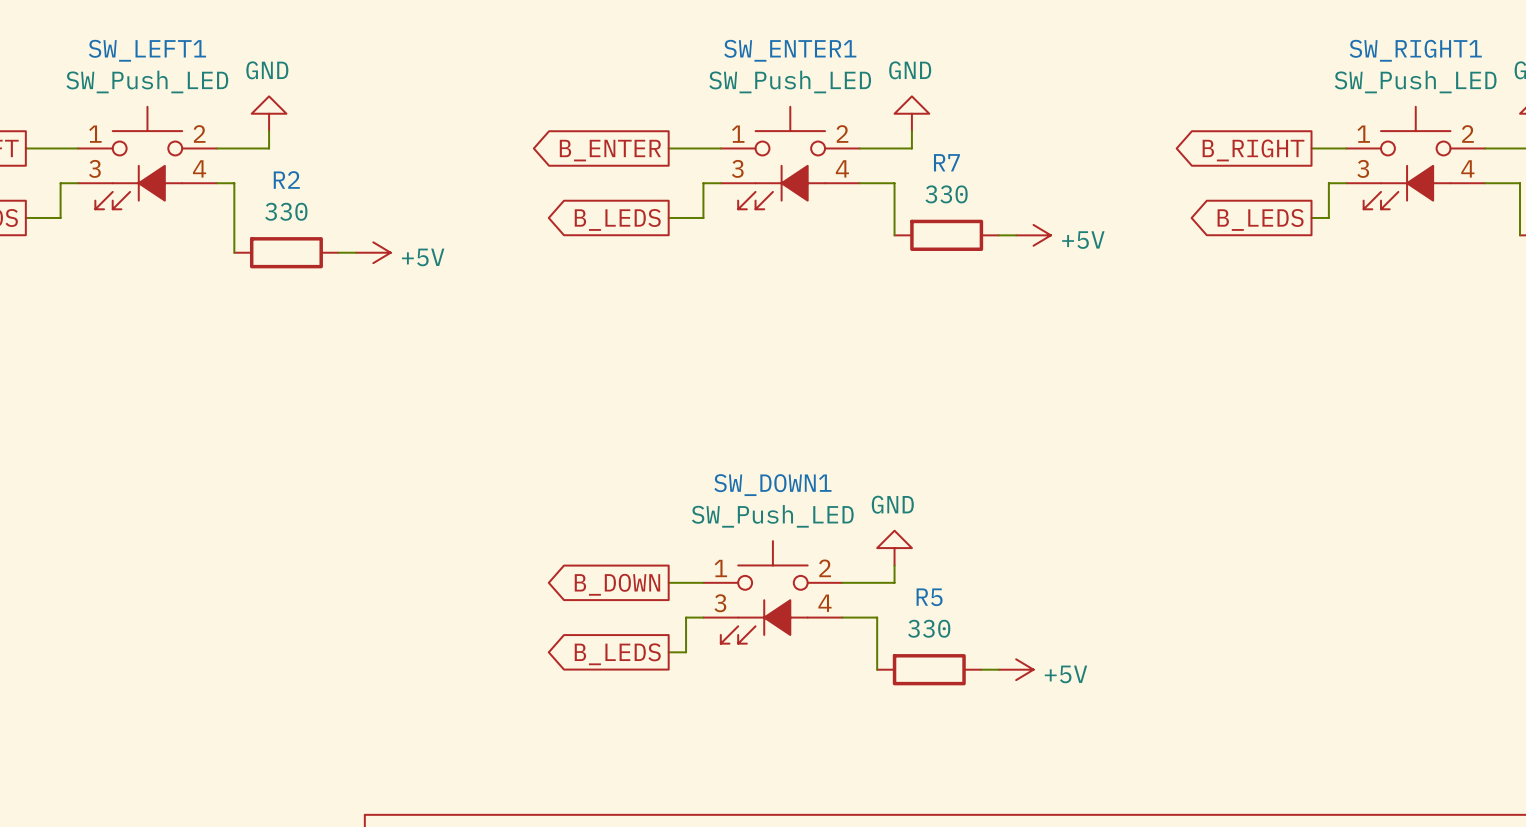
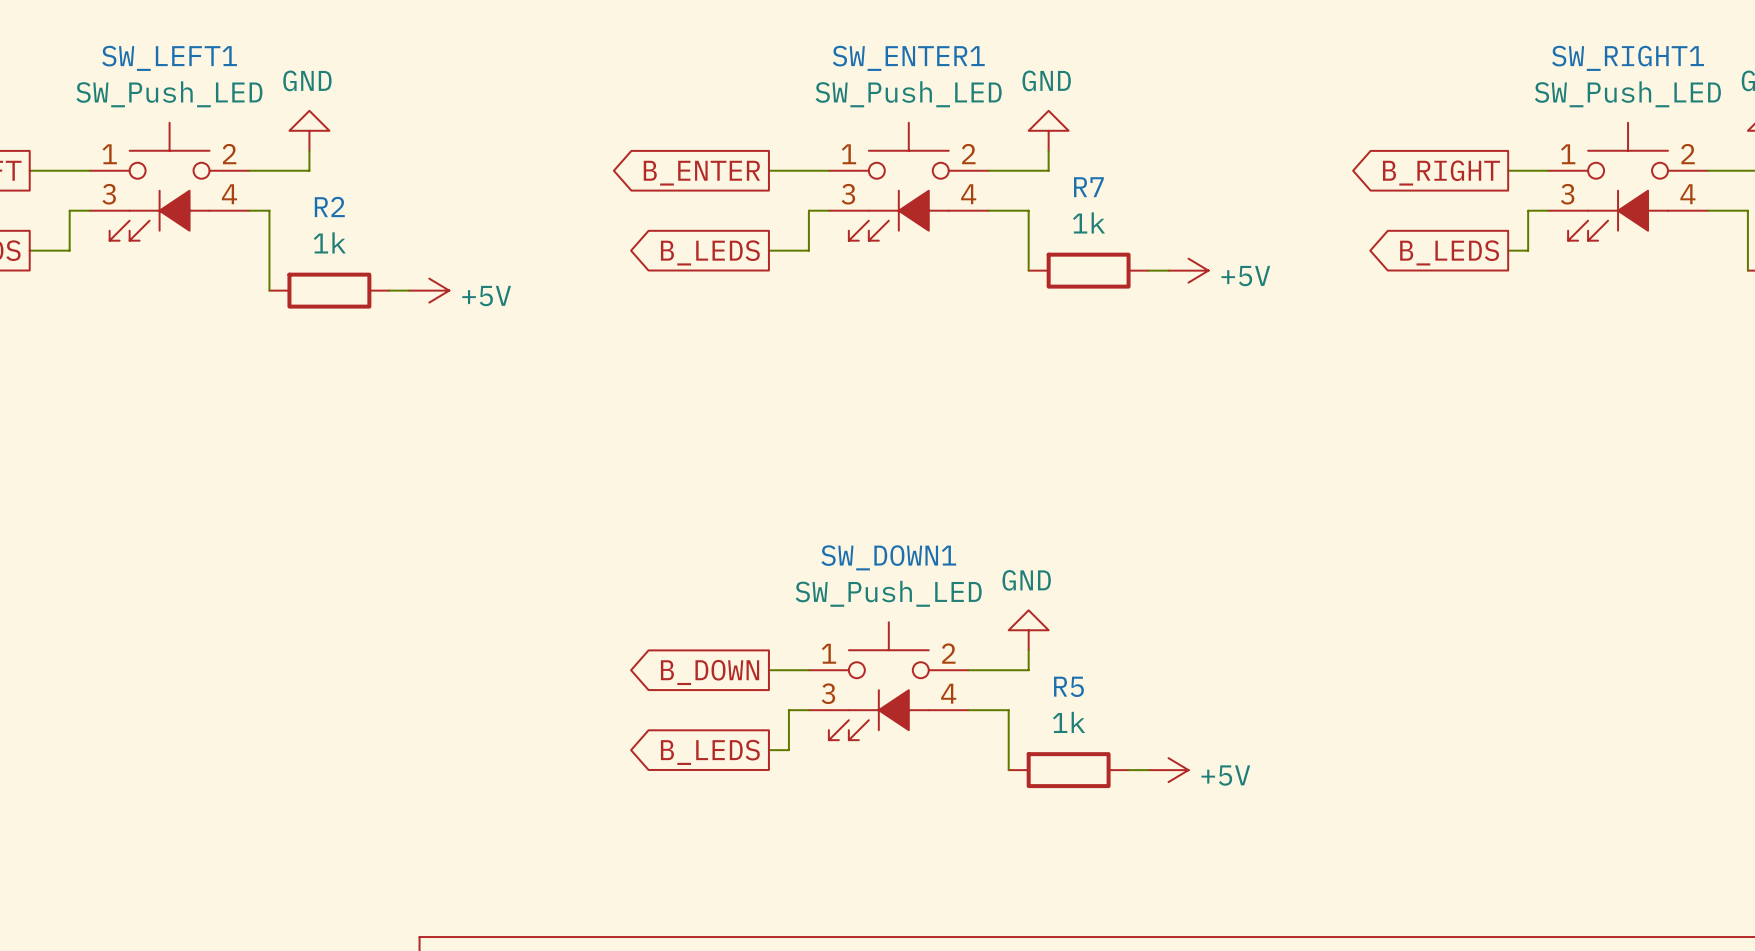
R7 value: 330 (946, 194) -> 1k (1089, 222)
R2 value: 330 (286, 211) -> 1k (329, 242)
R5 value: 330 (929, 628) -> 1k (1069, 722)

